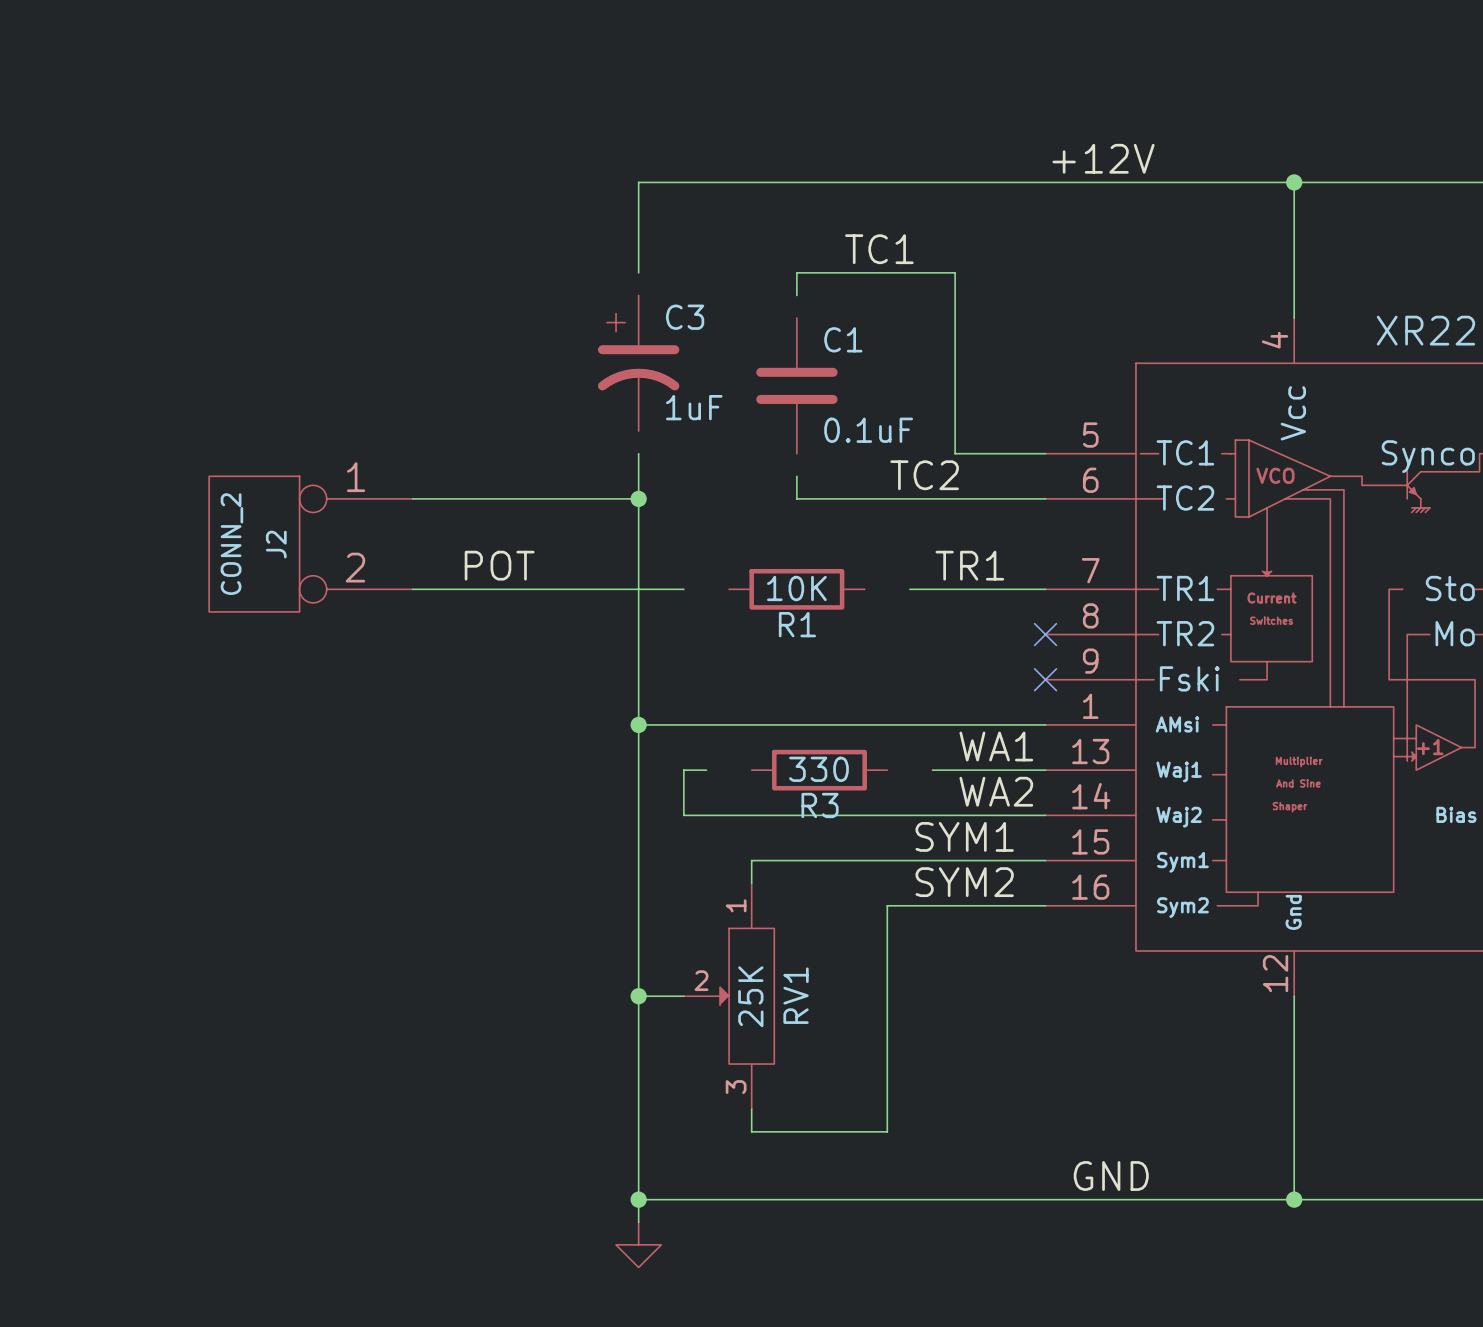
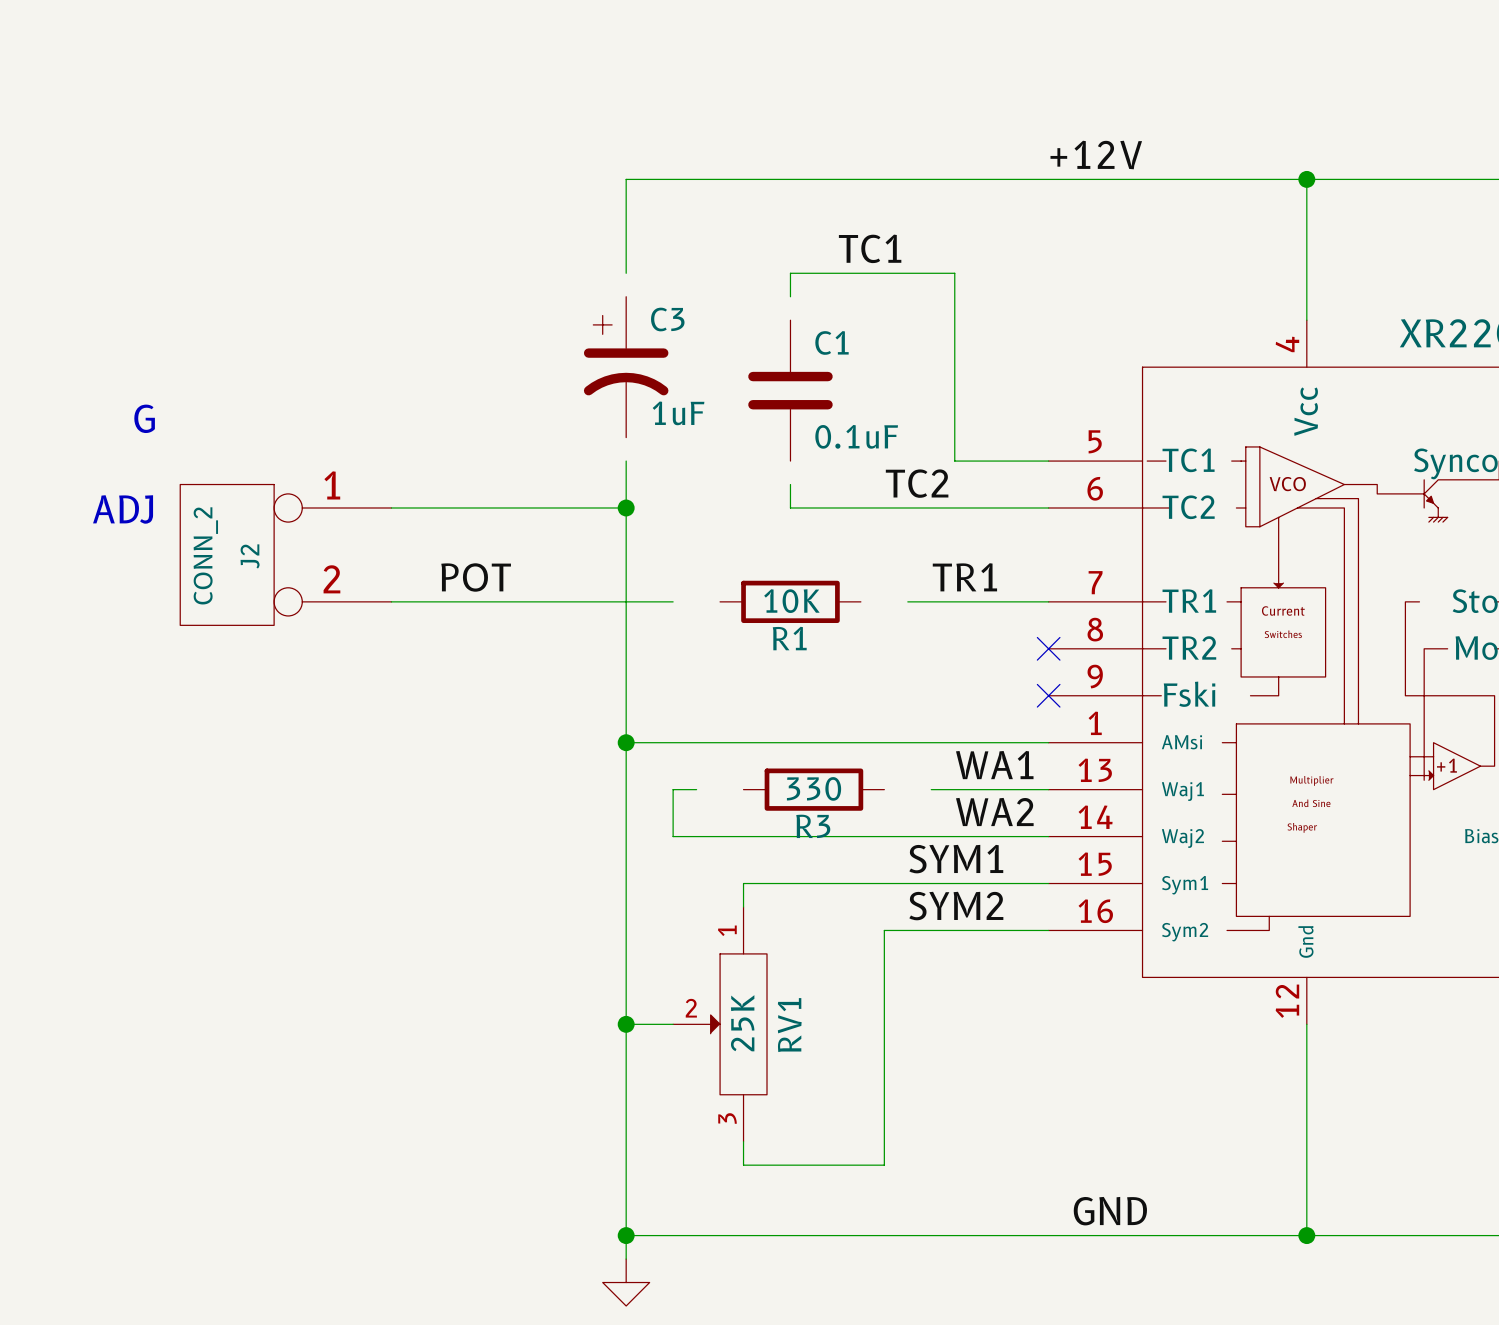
text: none -> G (144, 418)
text: none -> ADJ (123, 509)

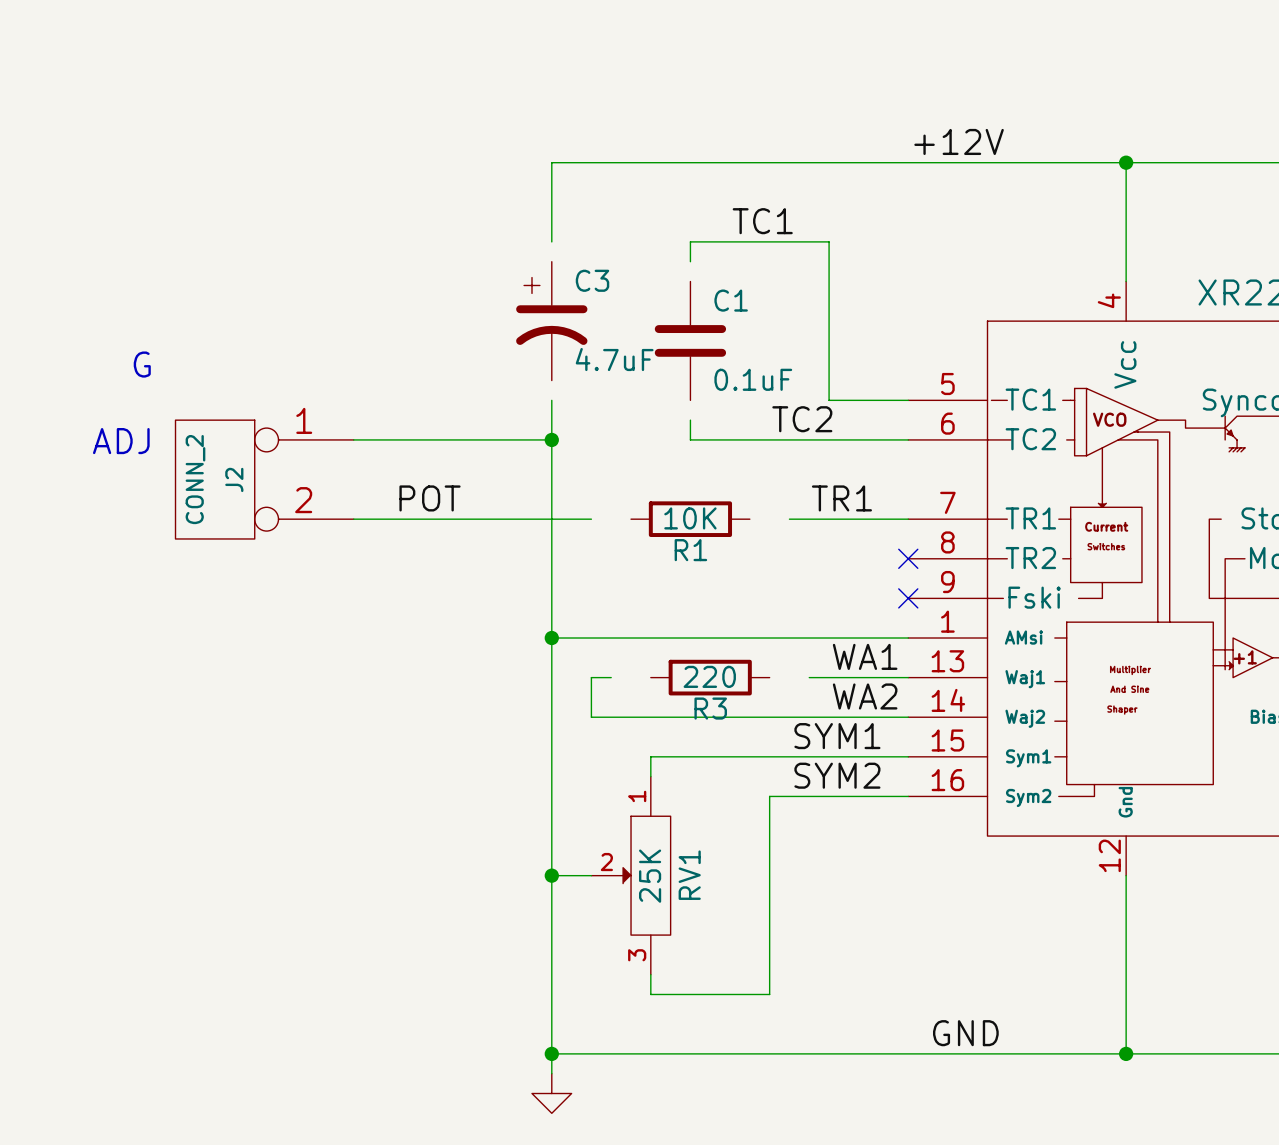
C3 value: 1uF (678, 413) -> 4.7uF (614, 359)
R3 value: 330 (814, 788) -> 220 (709, 676)

